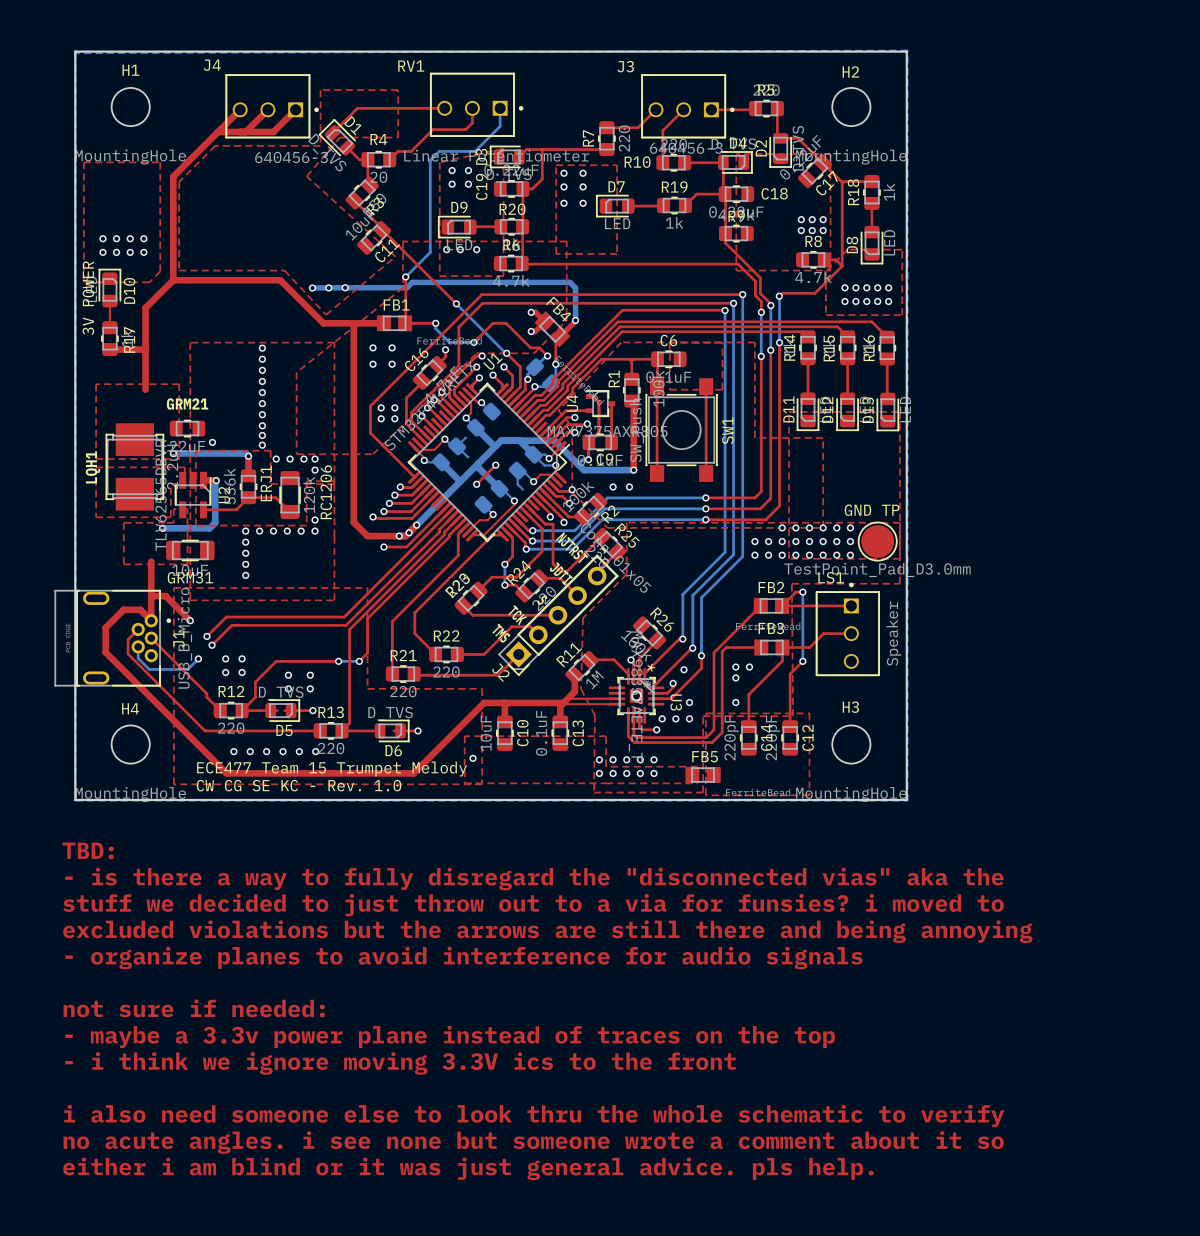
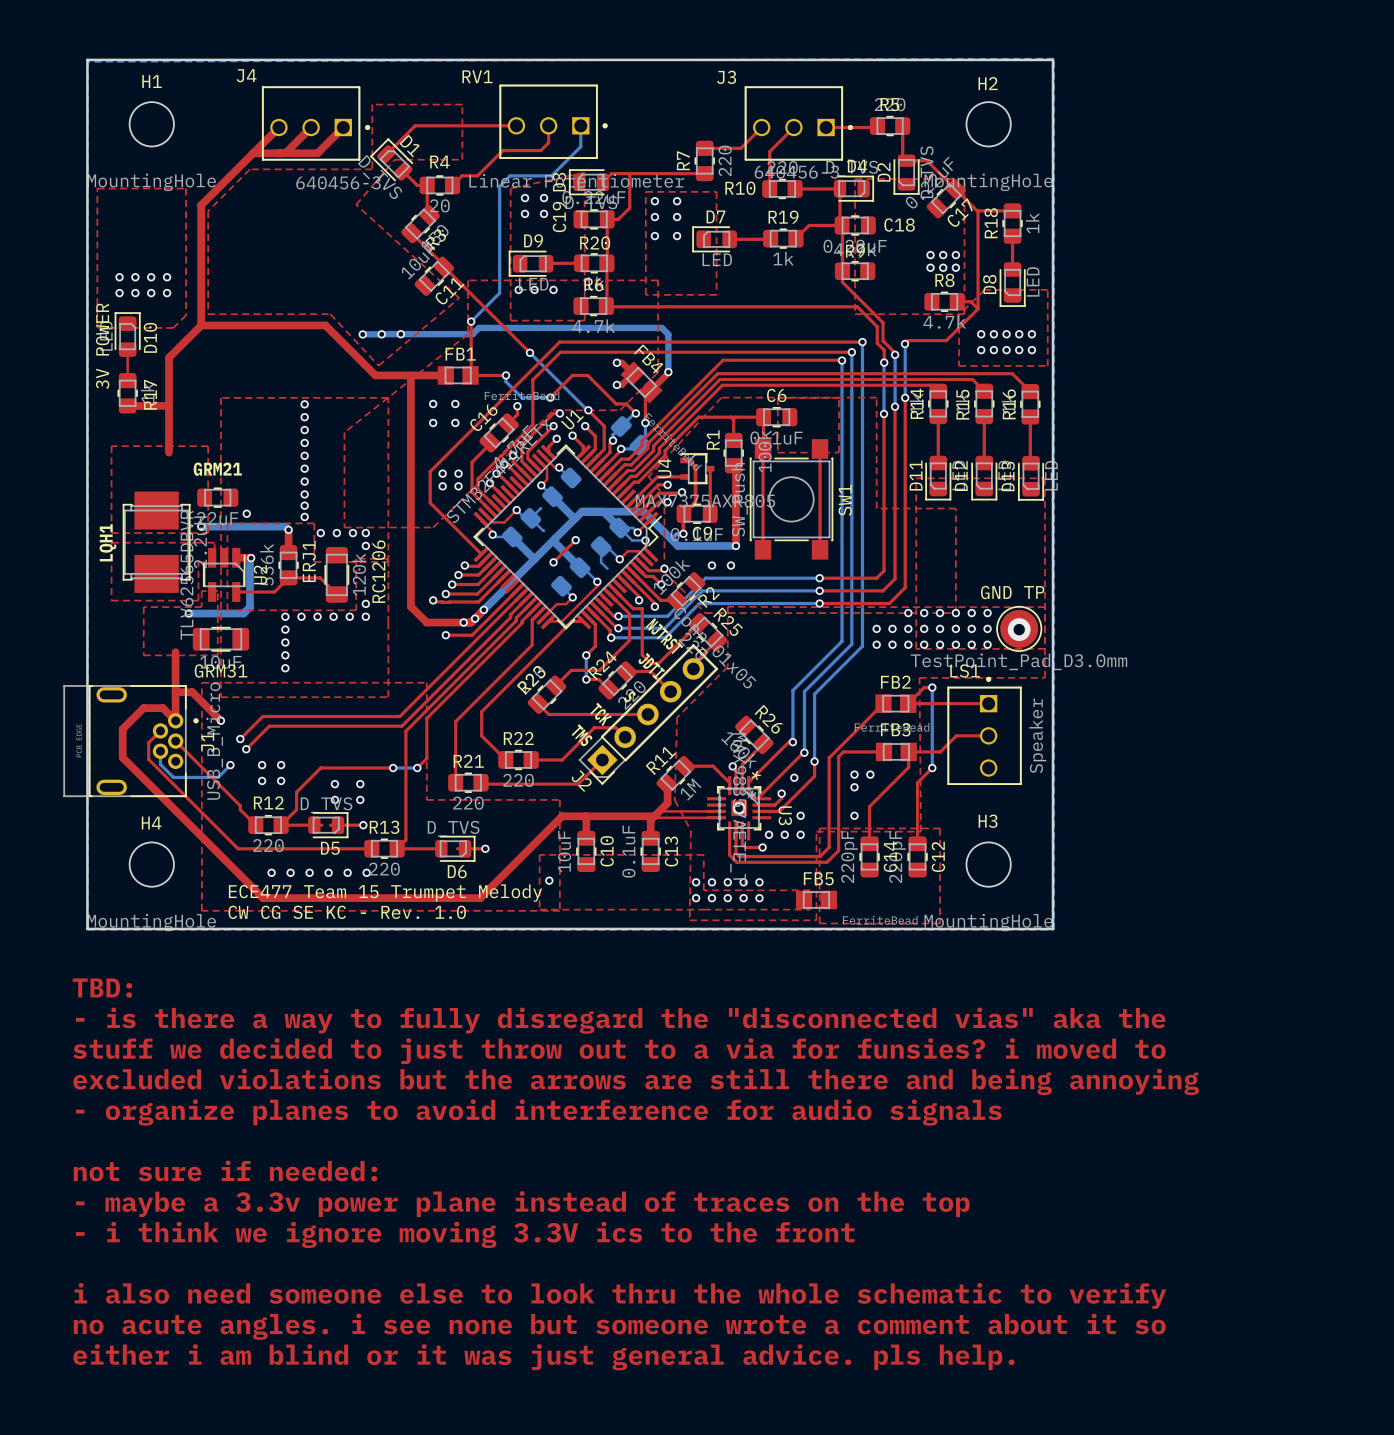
via: none -> (1019, 629)

